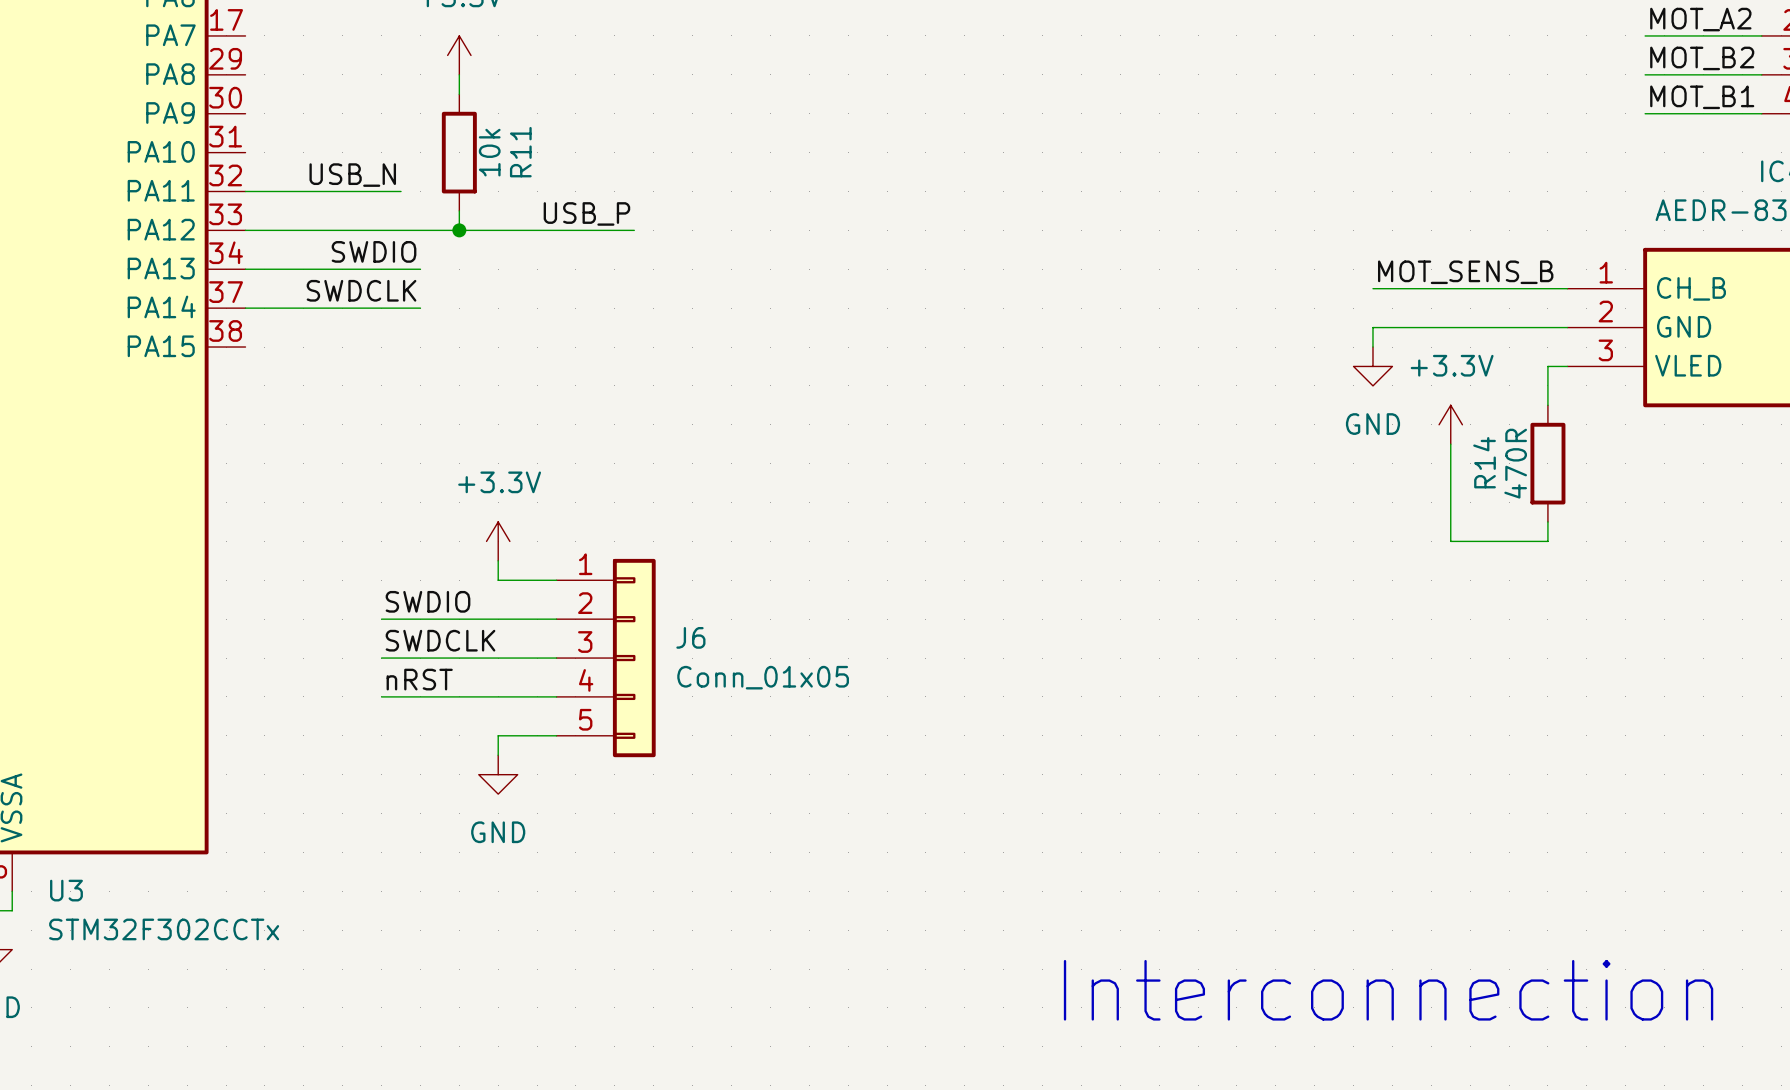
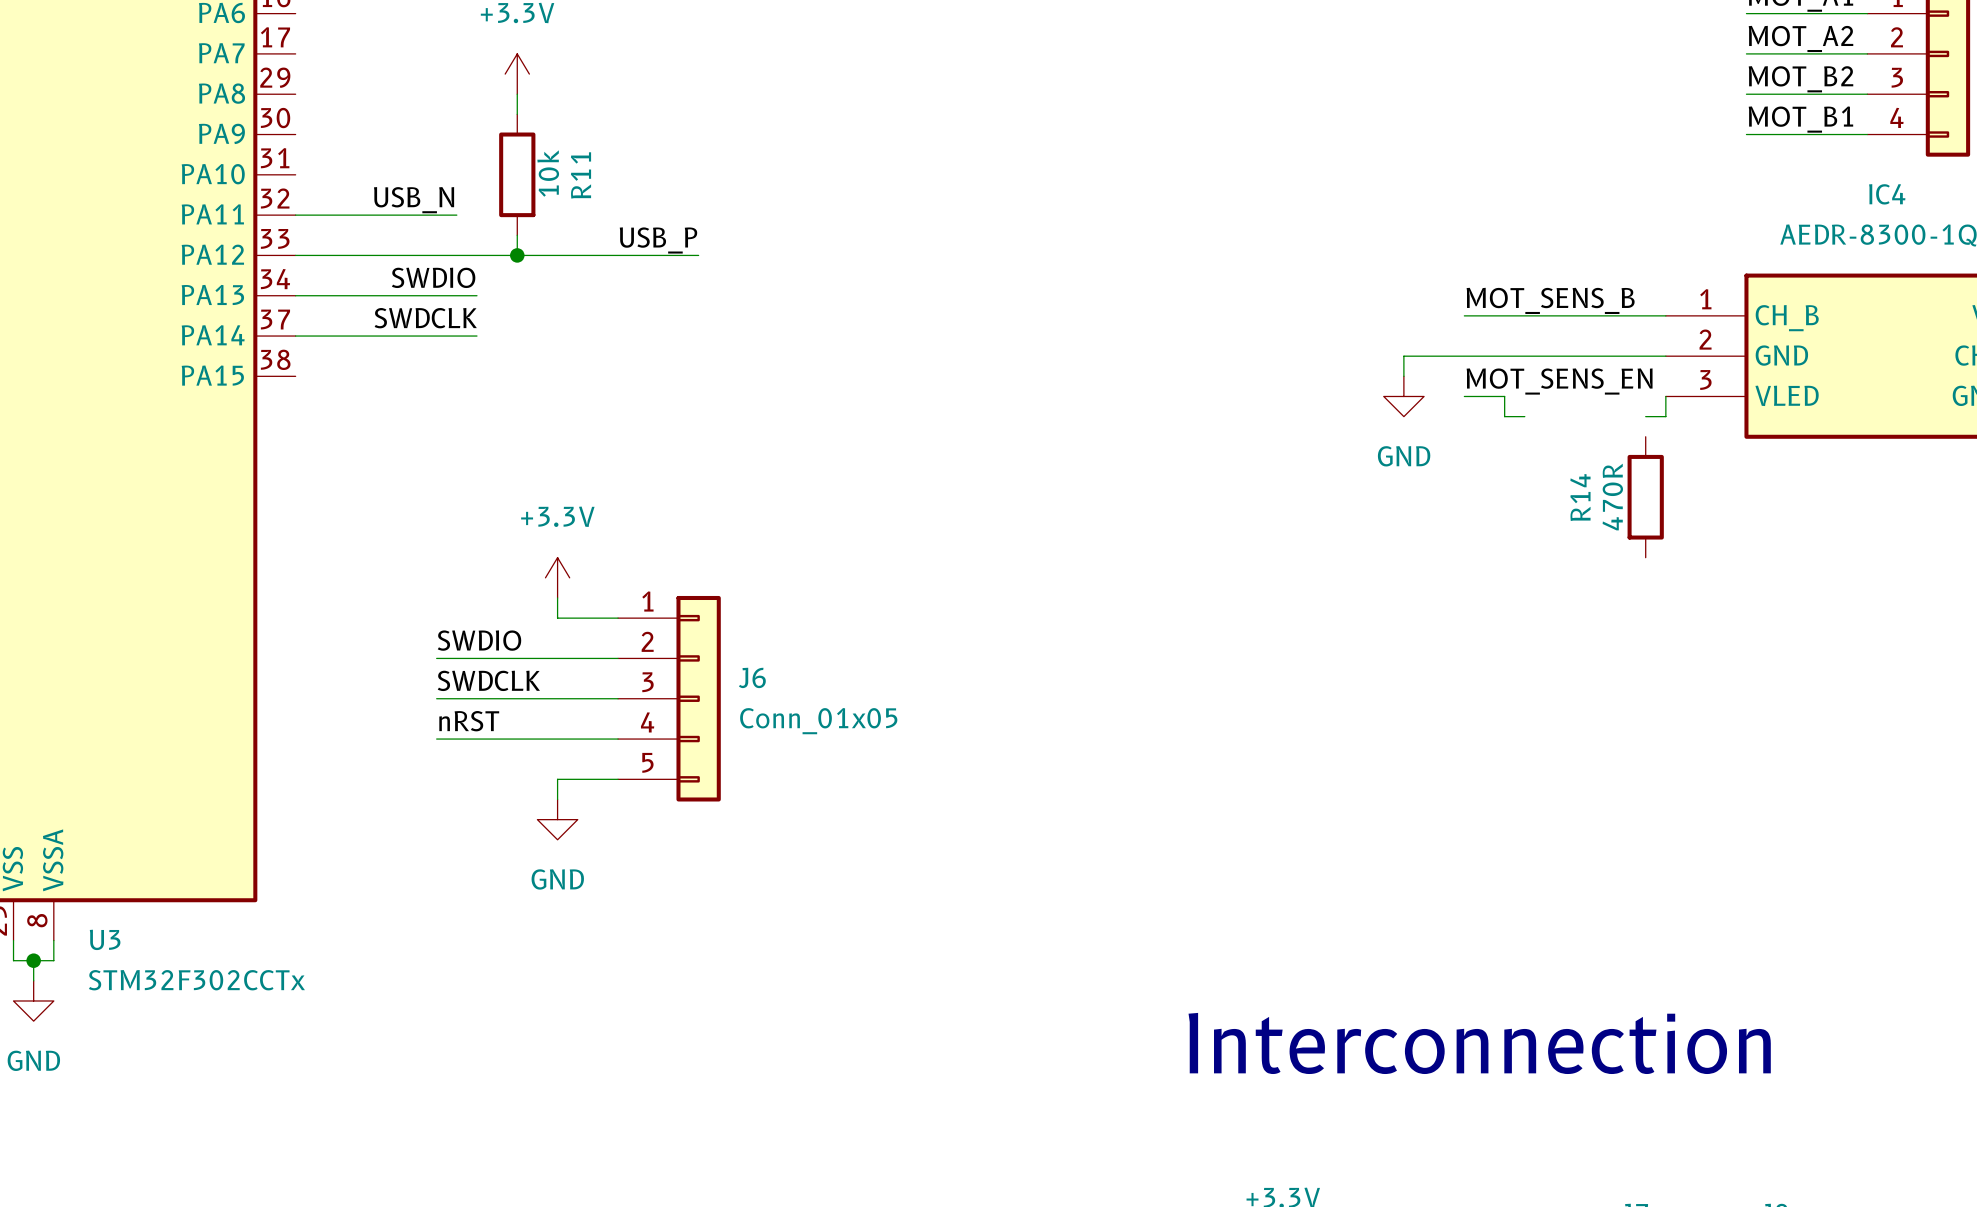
wire: (1372, 327) (1372, 347) -> (1464, 356) (1403, 356) (1403, 376)
label: none -> MOT_SENS_EN (1559, 381)
wire: none -> (1464, 396) (1504, 396) (1504, 416) (1524, 416)
power symbol position: GND (1372, 366) -> GND (1403, 396)
wire: (1567, 366) (1547, 366) (1547, 405) -> (1665, 396) (1665, 416) (1645, 416)
power symbol: +3.3V (1450, 424) -> none
wire: (1450, 444) (1450, 541) (1547, 541) (1547, 521) -> none

